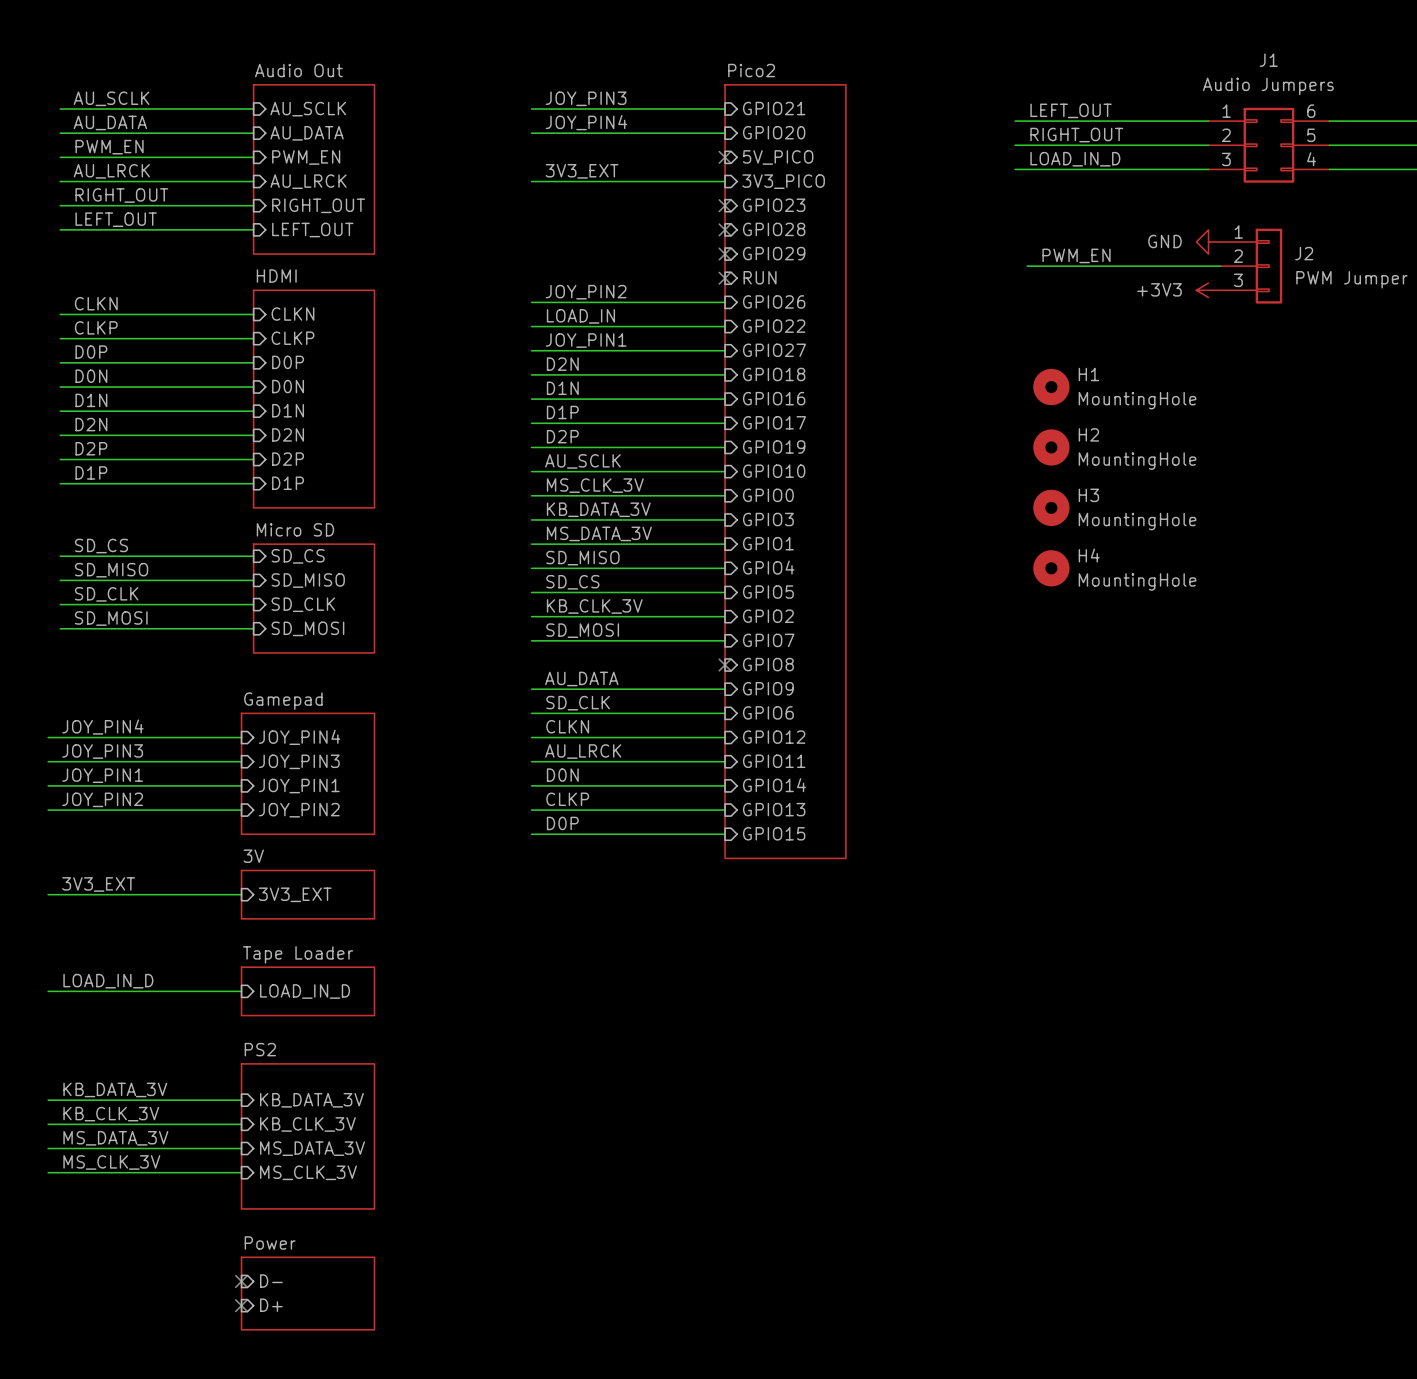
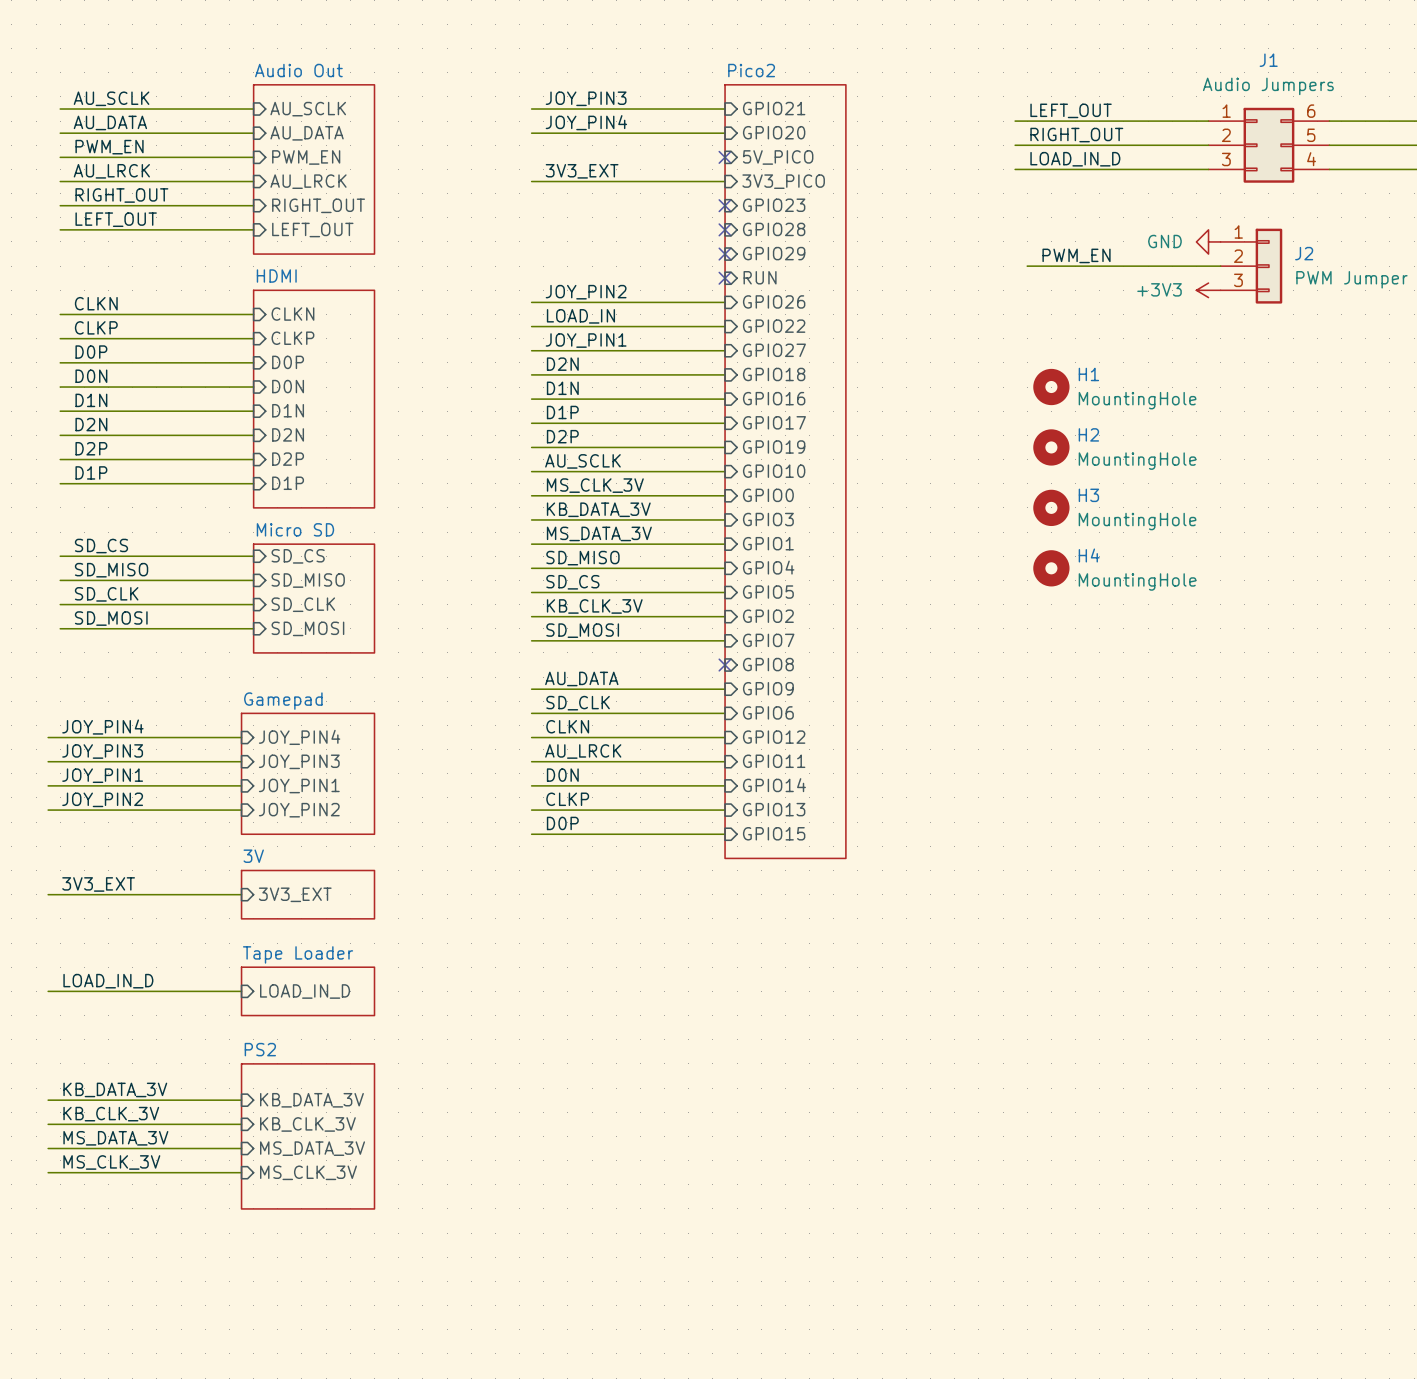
no-connect mark: (241, 1281) -> none
sheet pin: D- (271, 1281) -> none
sheet Power: (308, 1293) -> none
no-connect mark: (241, 1305) -> none
sheet pin: D+ (271, 1305) -> none

